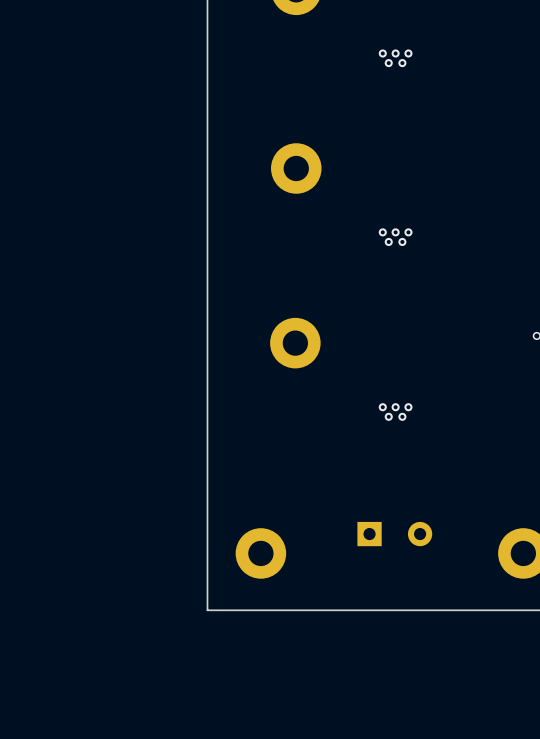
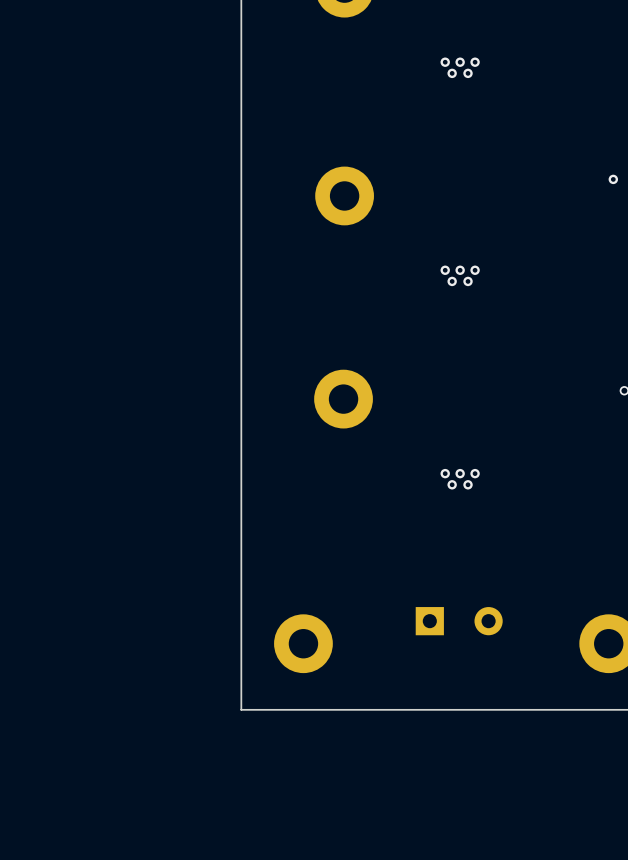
via: none -> (613, 179)

